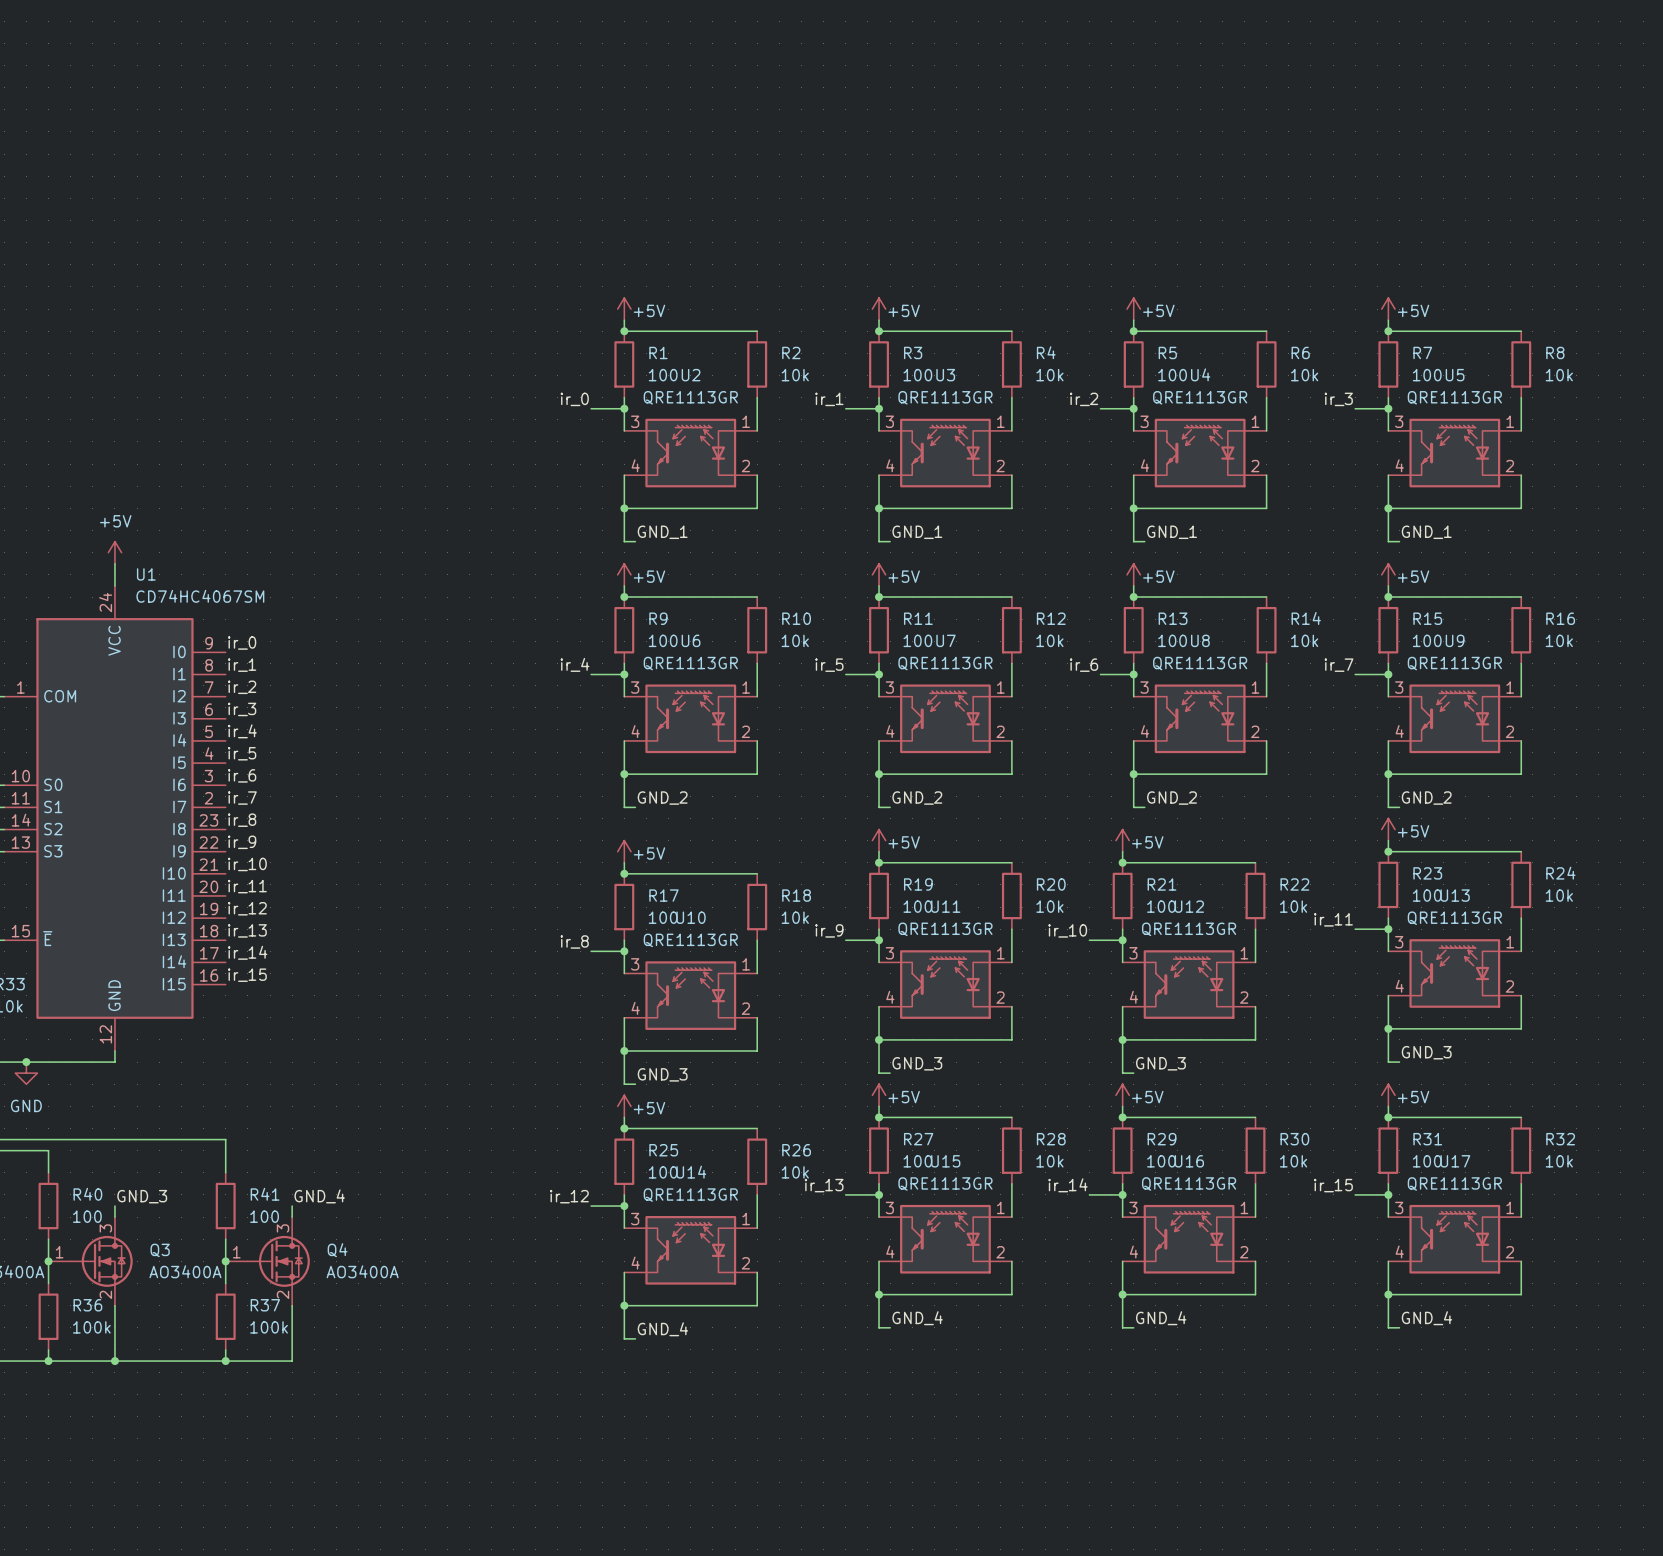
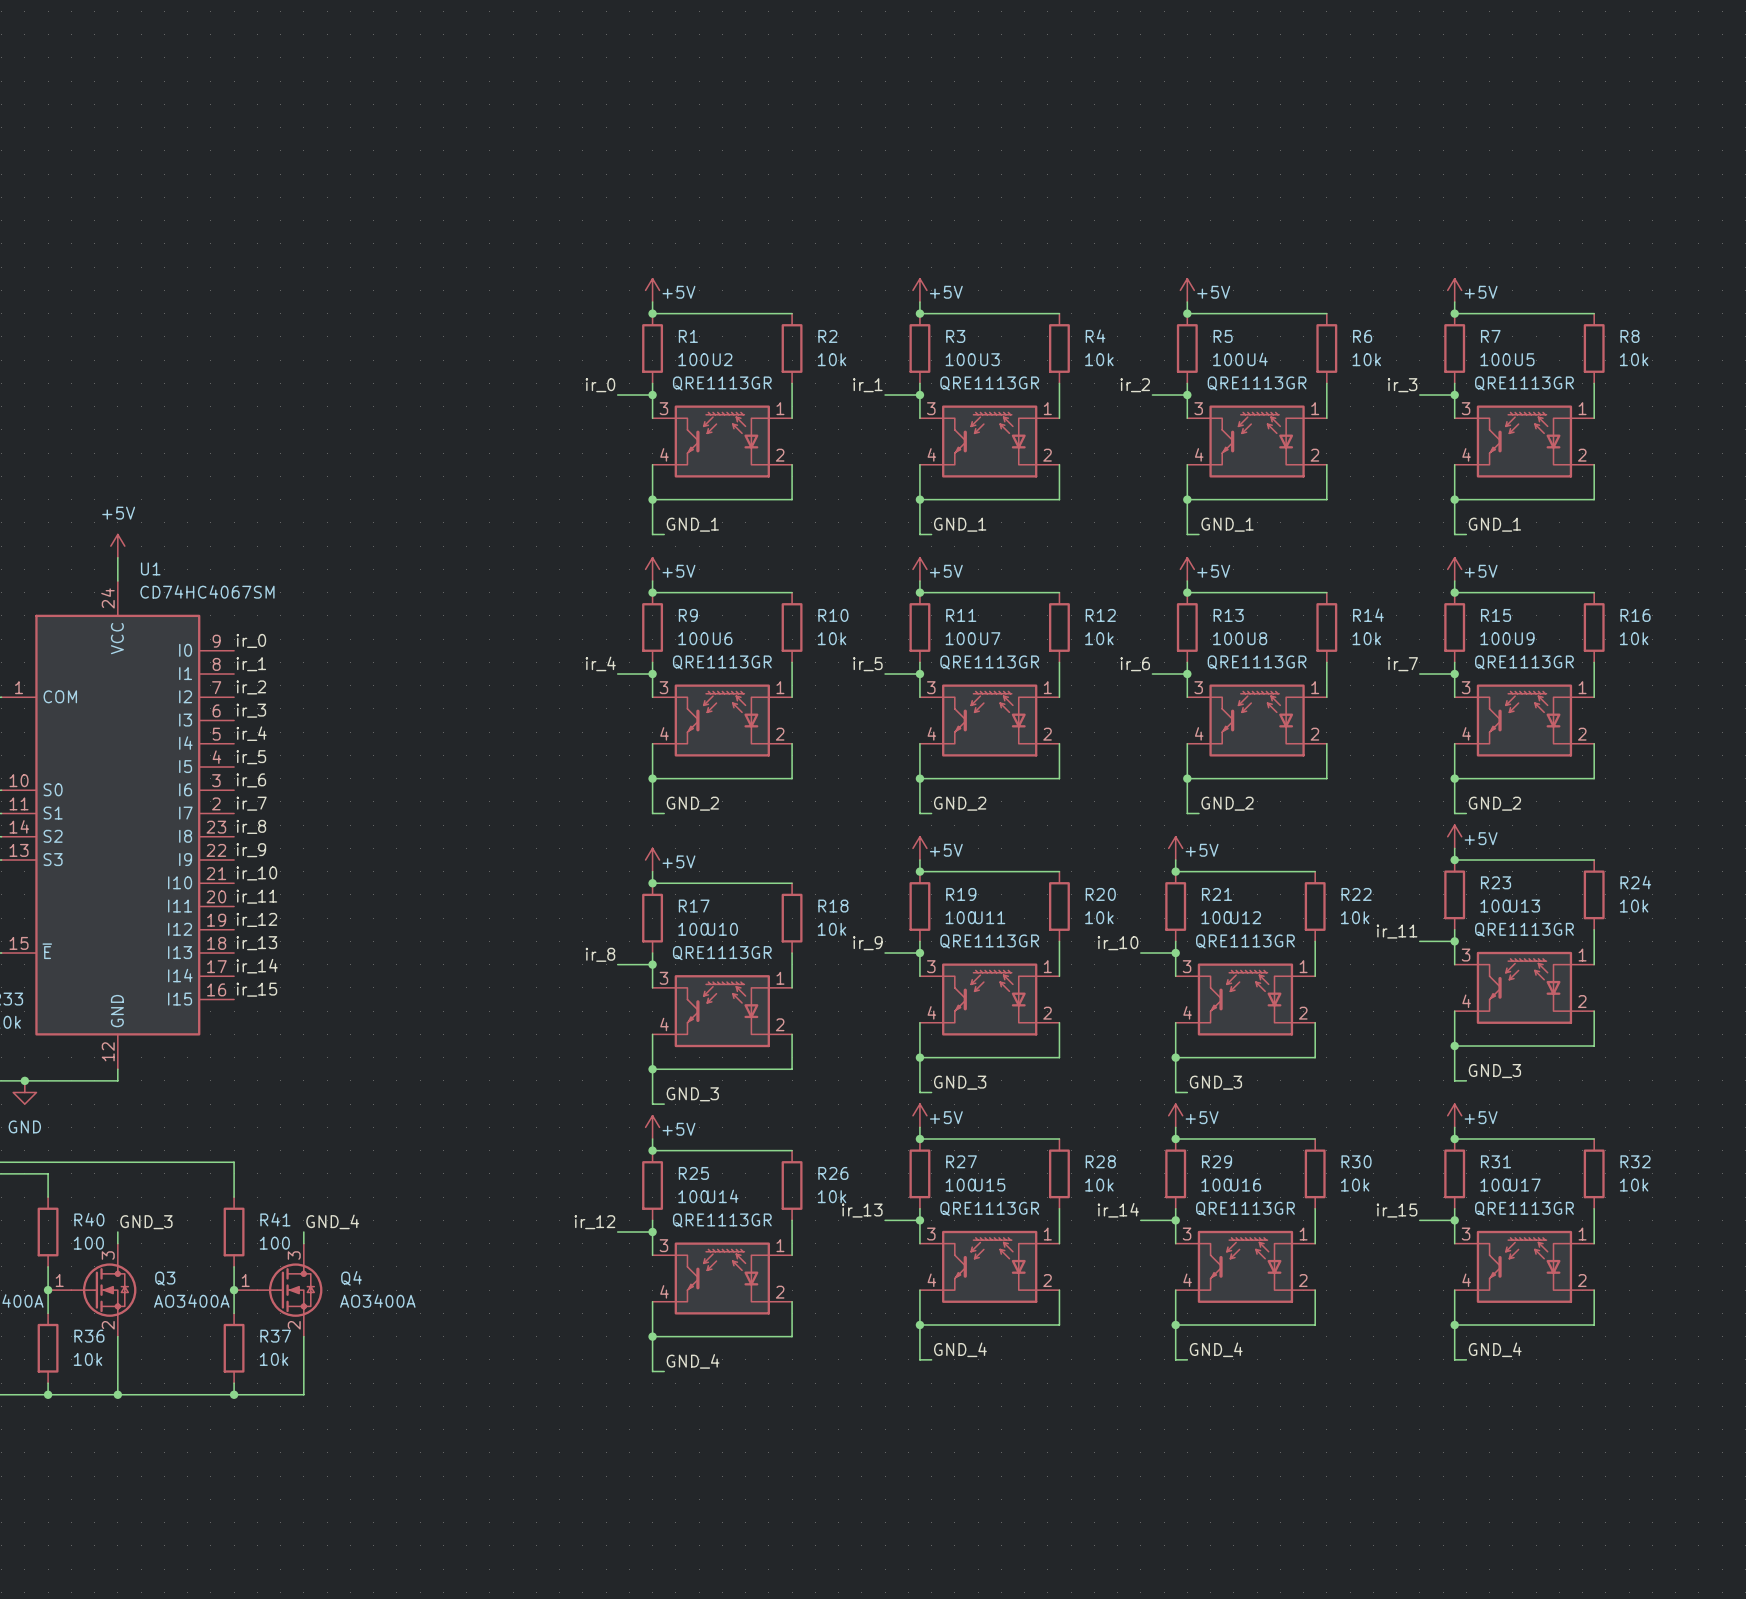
R36 value: 100k (91, 1327) -> 10k (88, 1359)
R37 value: 100k (269, 1327) -> 10k (274, 1359)

